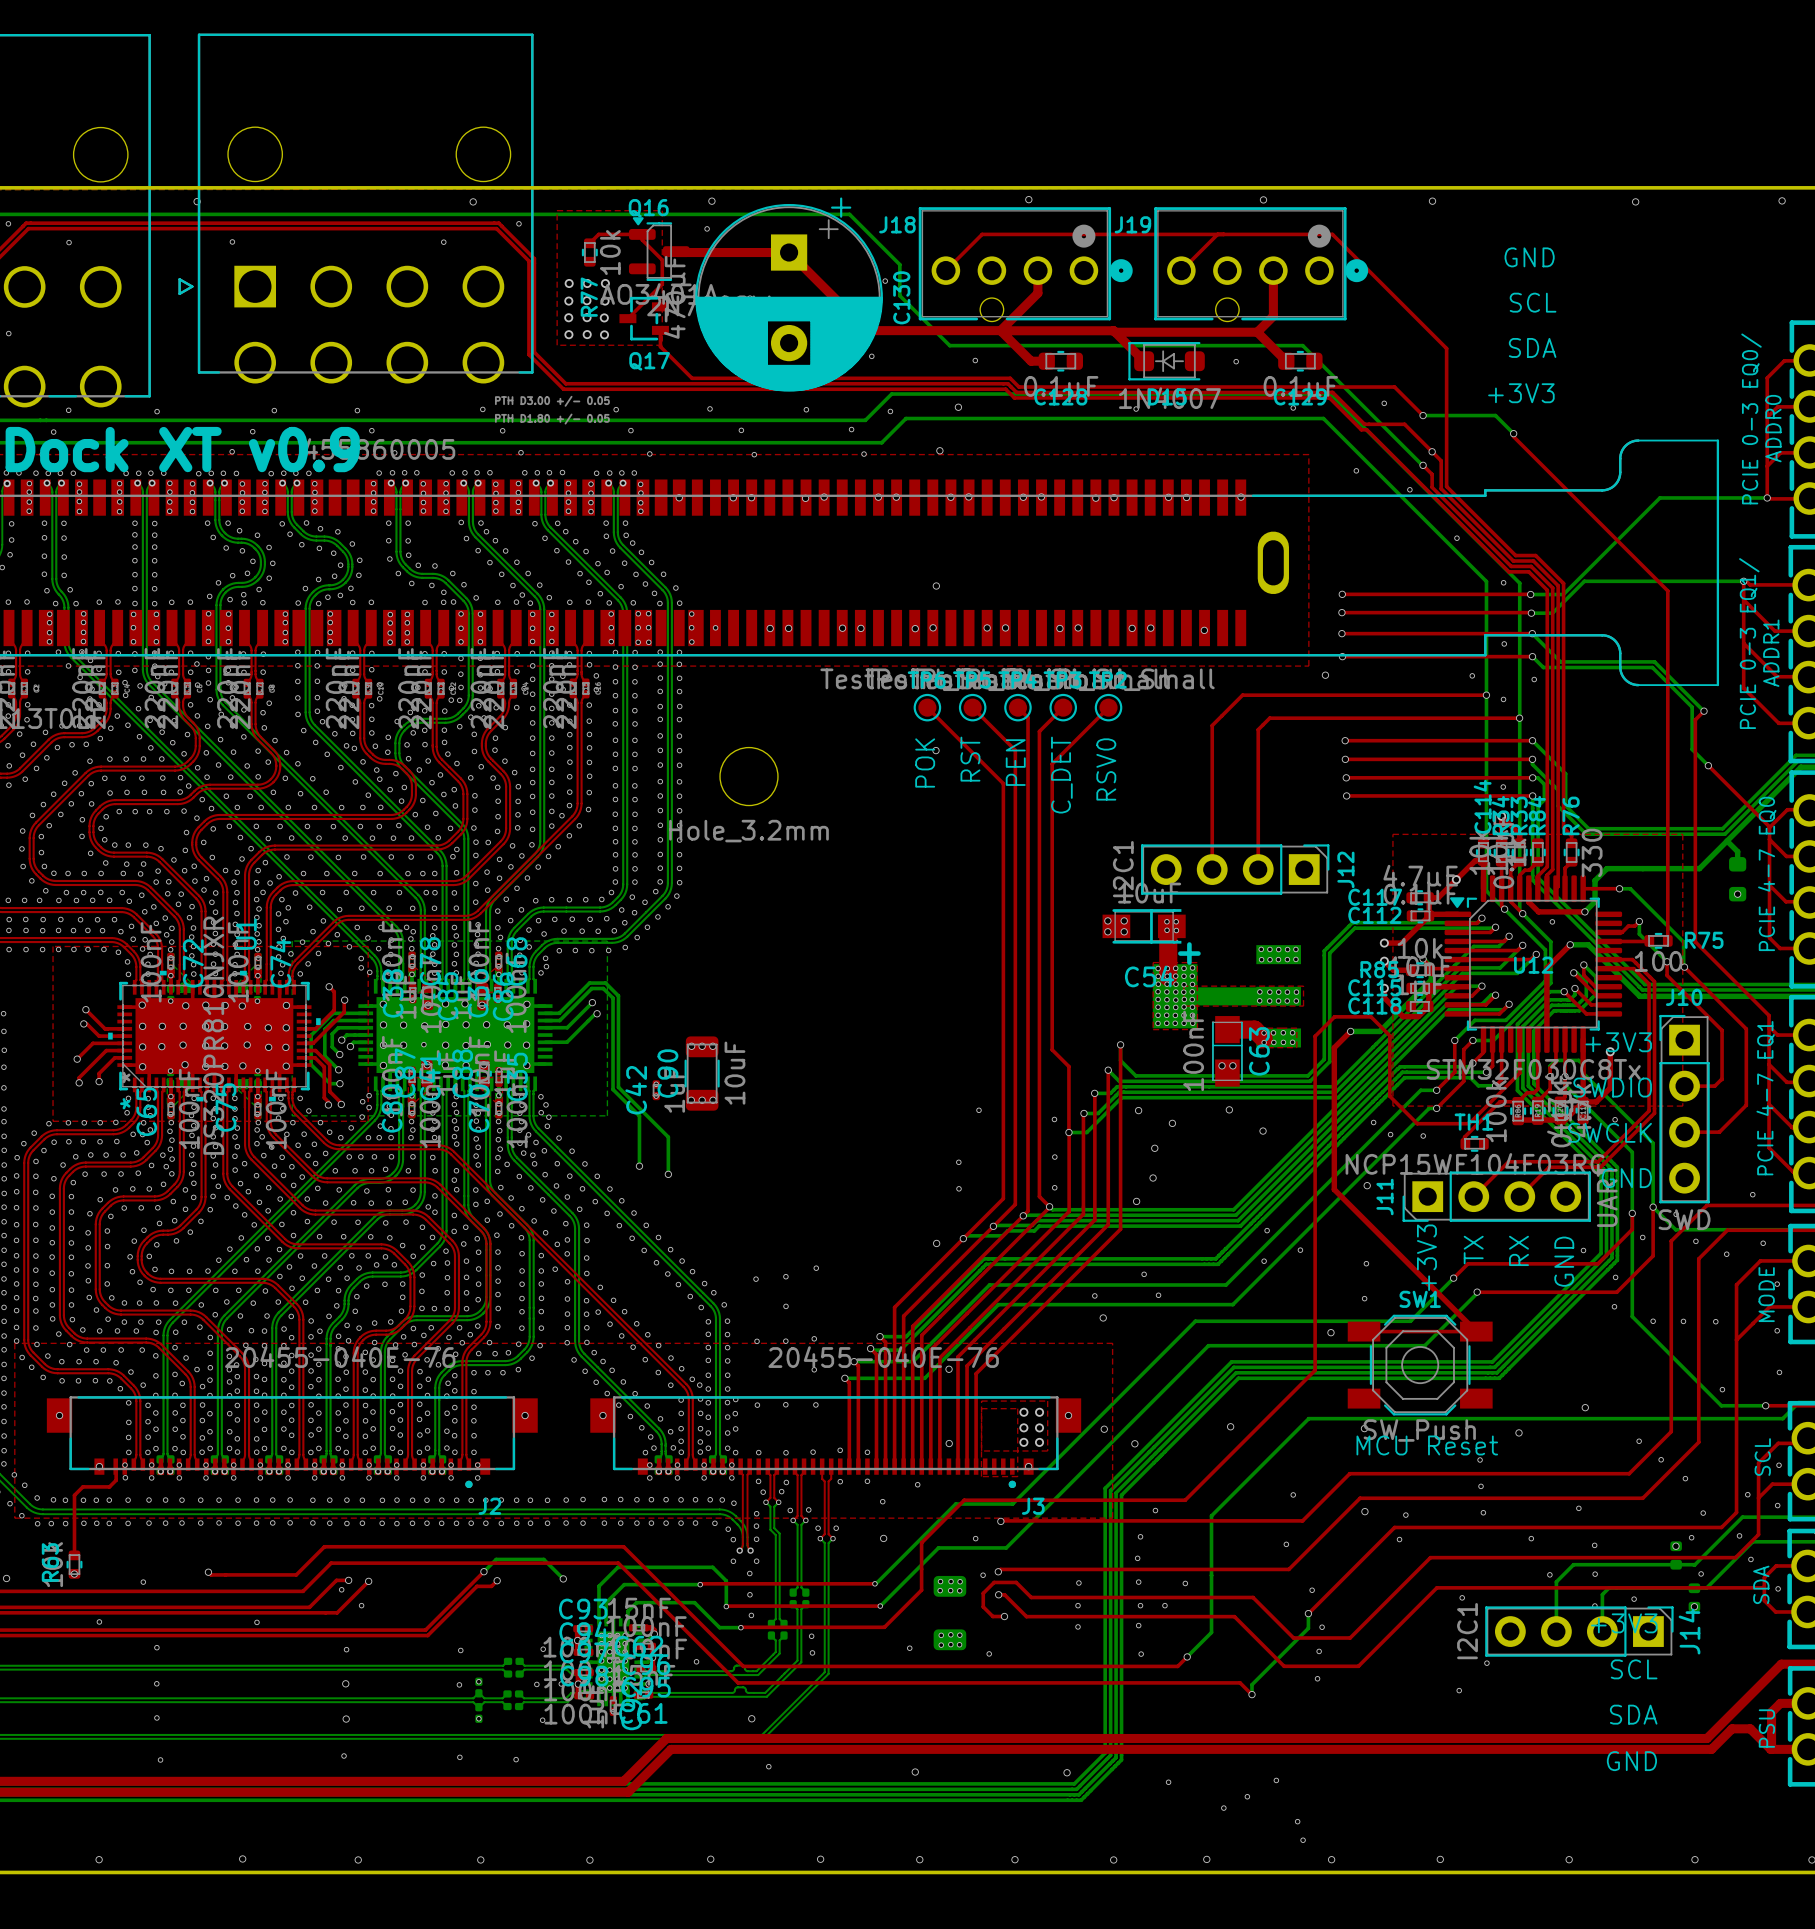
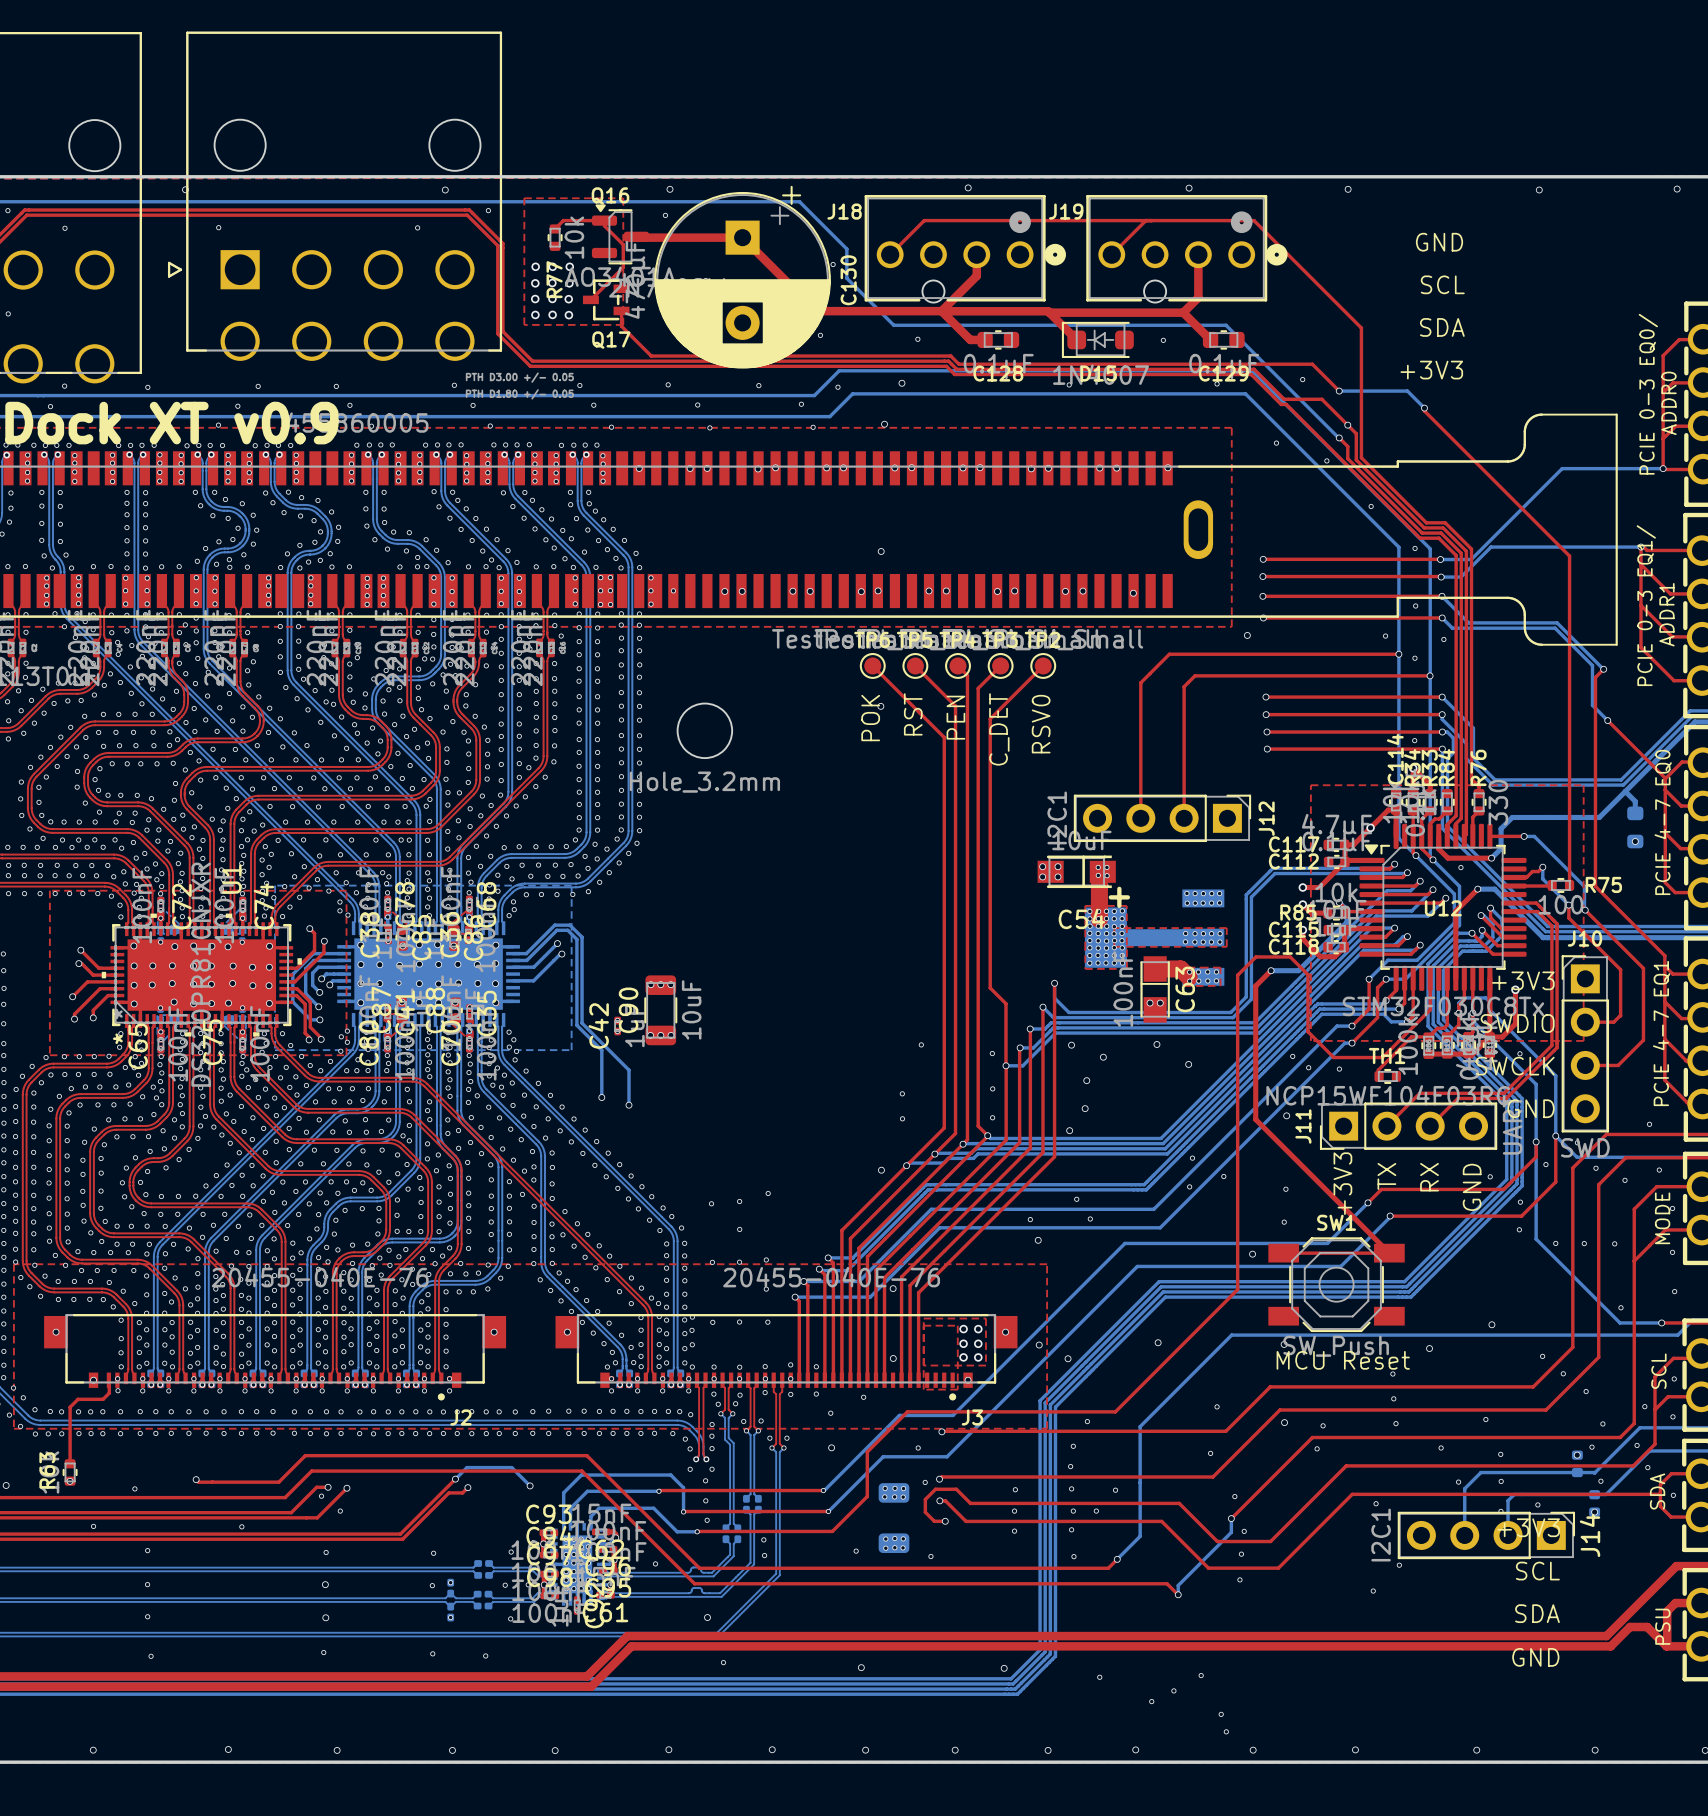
J3 footprint: [590, 1396, 1082, 1489] -> [555, 1314, 1018, 1401]
via: none -> (714, 1378)
via: none -> (739, 1378)
via: none -> (765, 1378)
via: none -> (790, 1378)
via: none -> (765, 1392)

